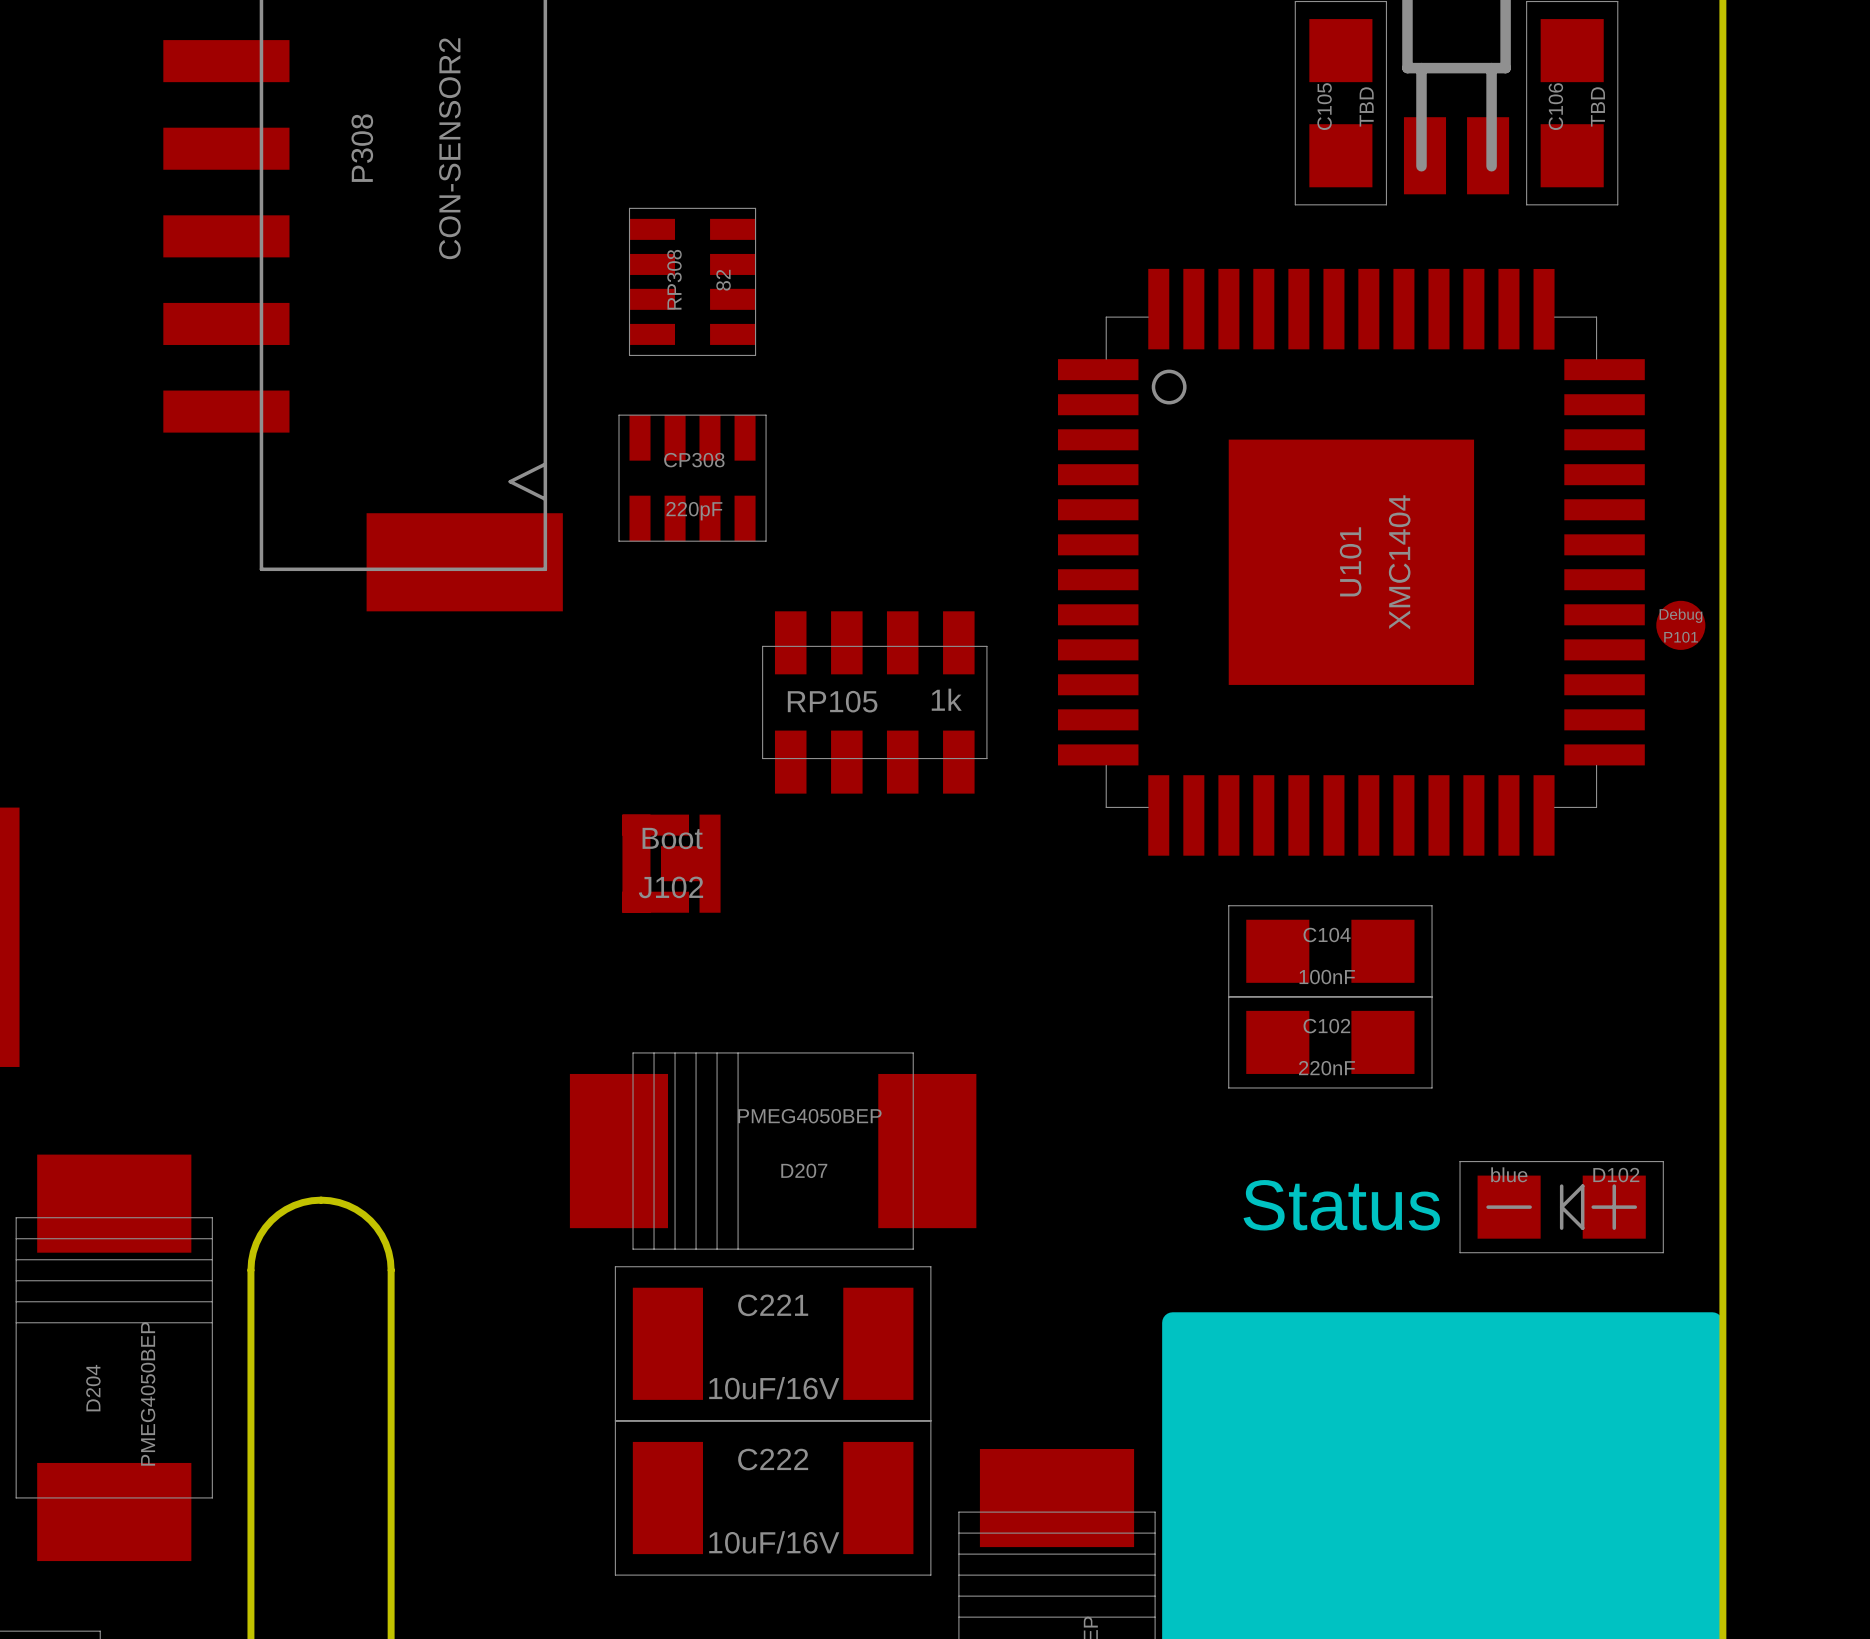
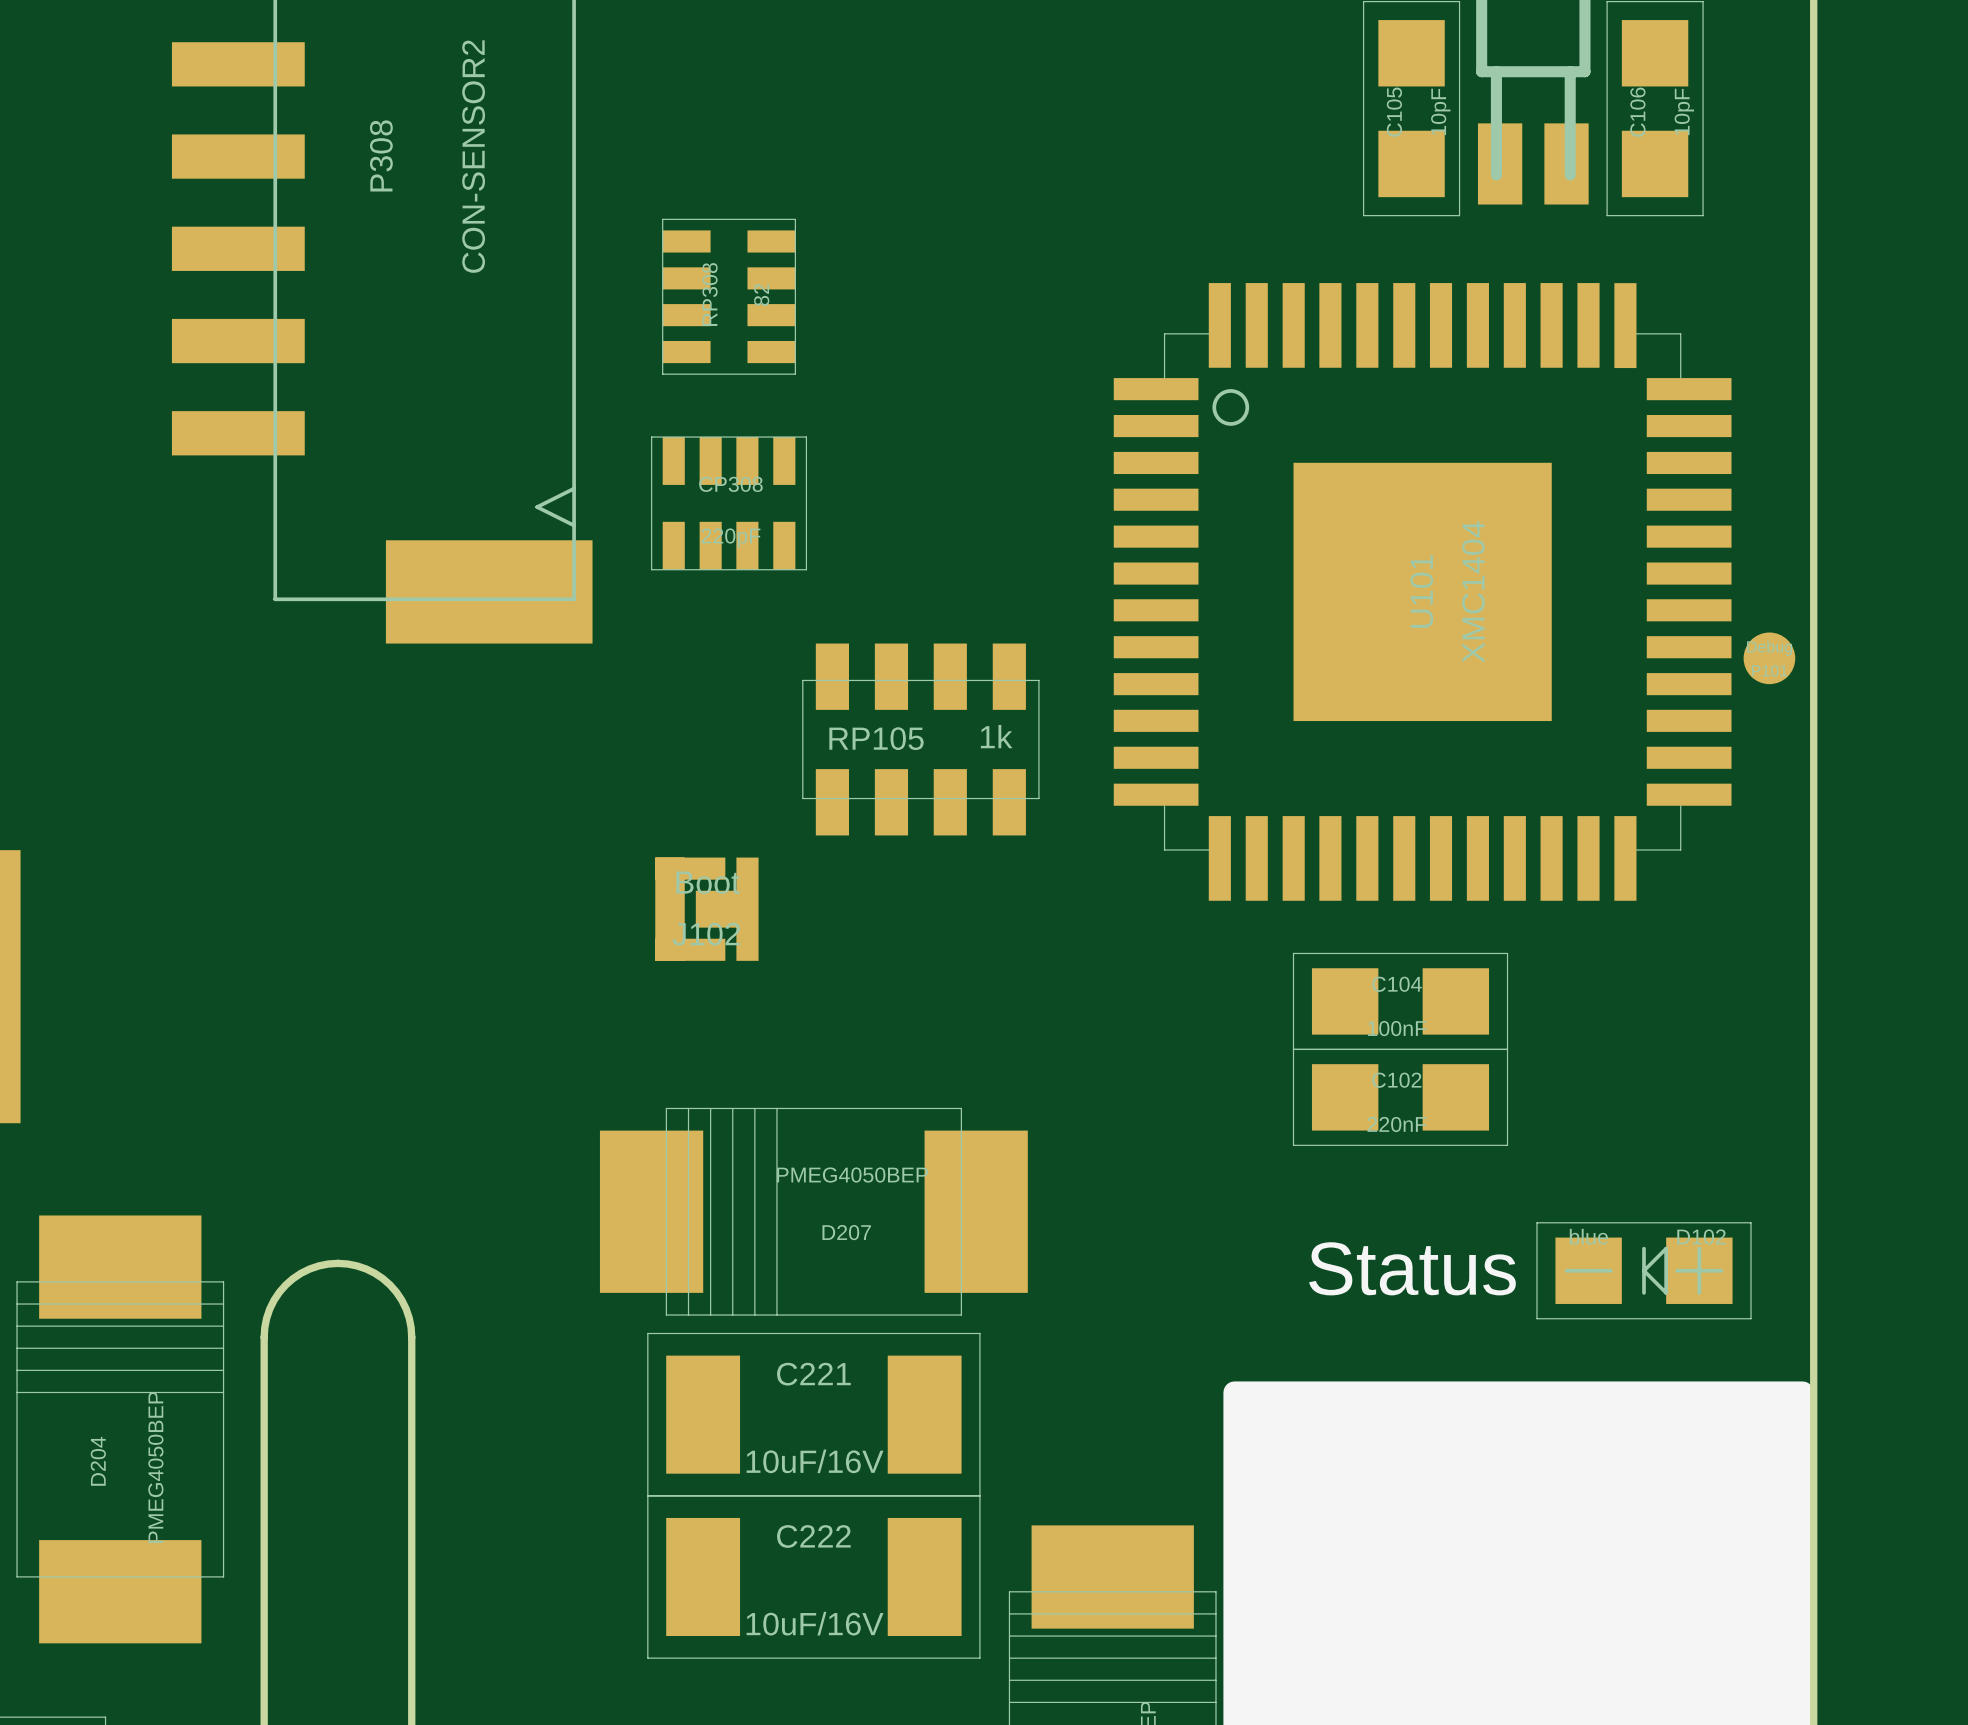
C105 value: TBD (1366, 106) -> 10pF (1440, 111)
C106 value: TBD (1597, 106) -> 10pF (1684, 111)

